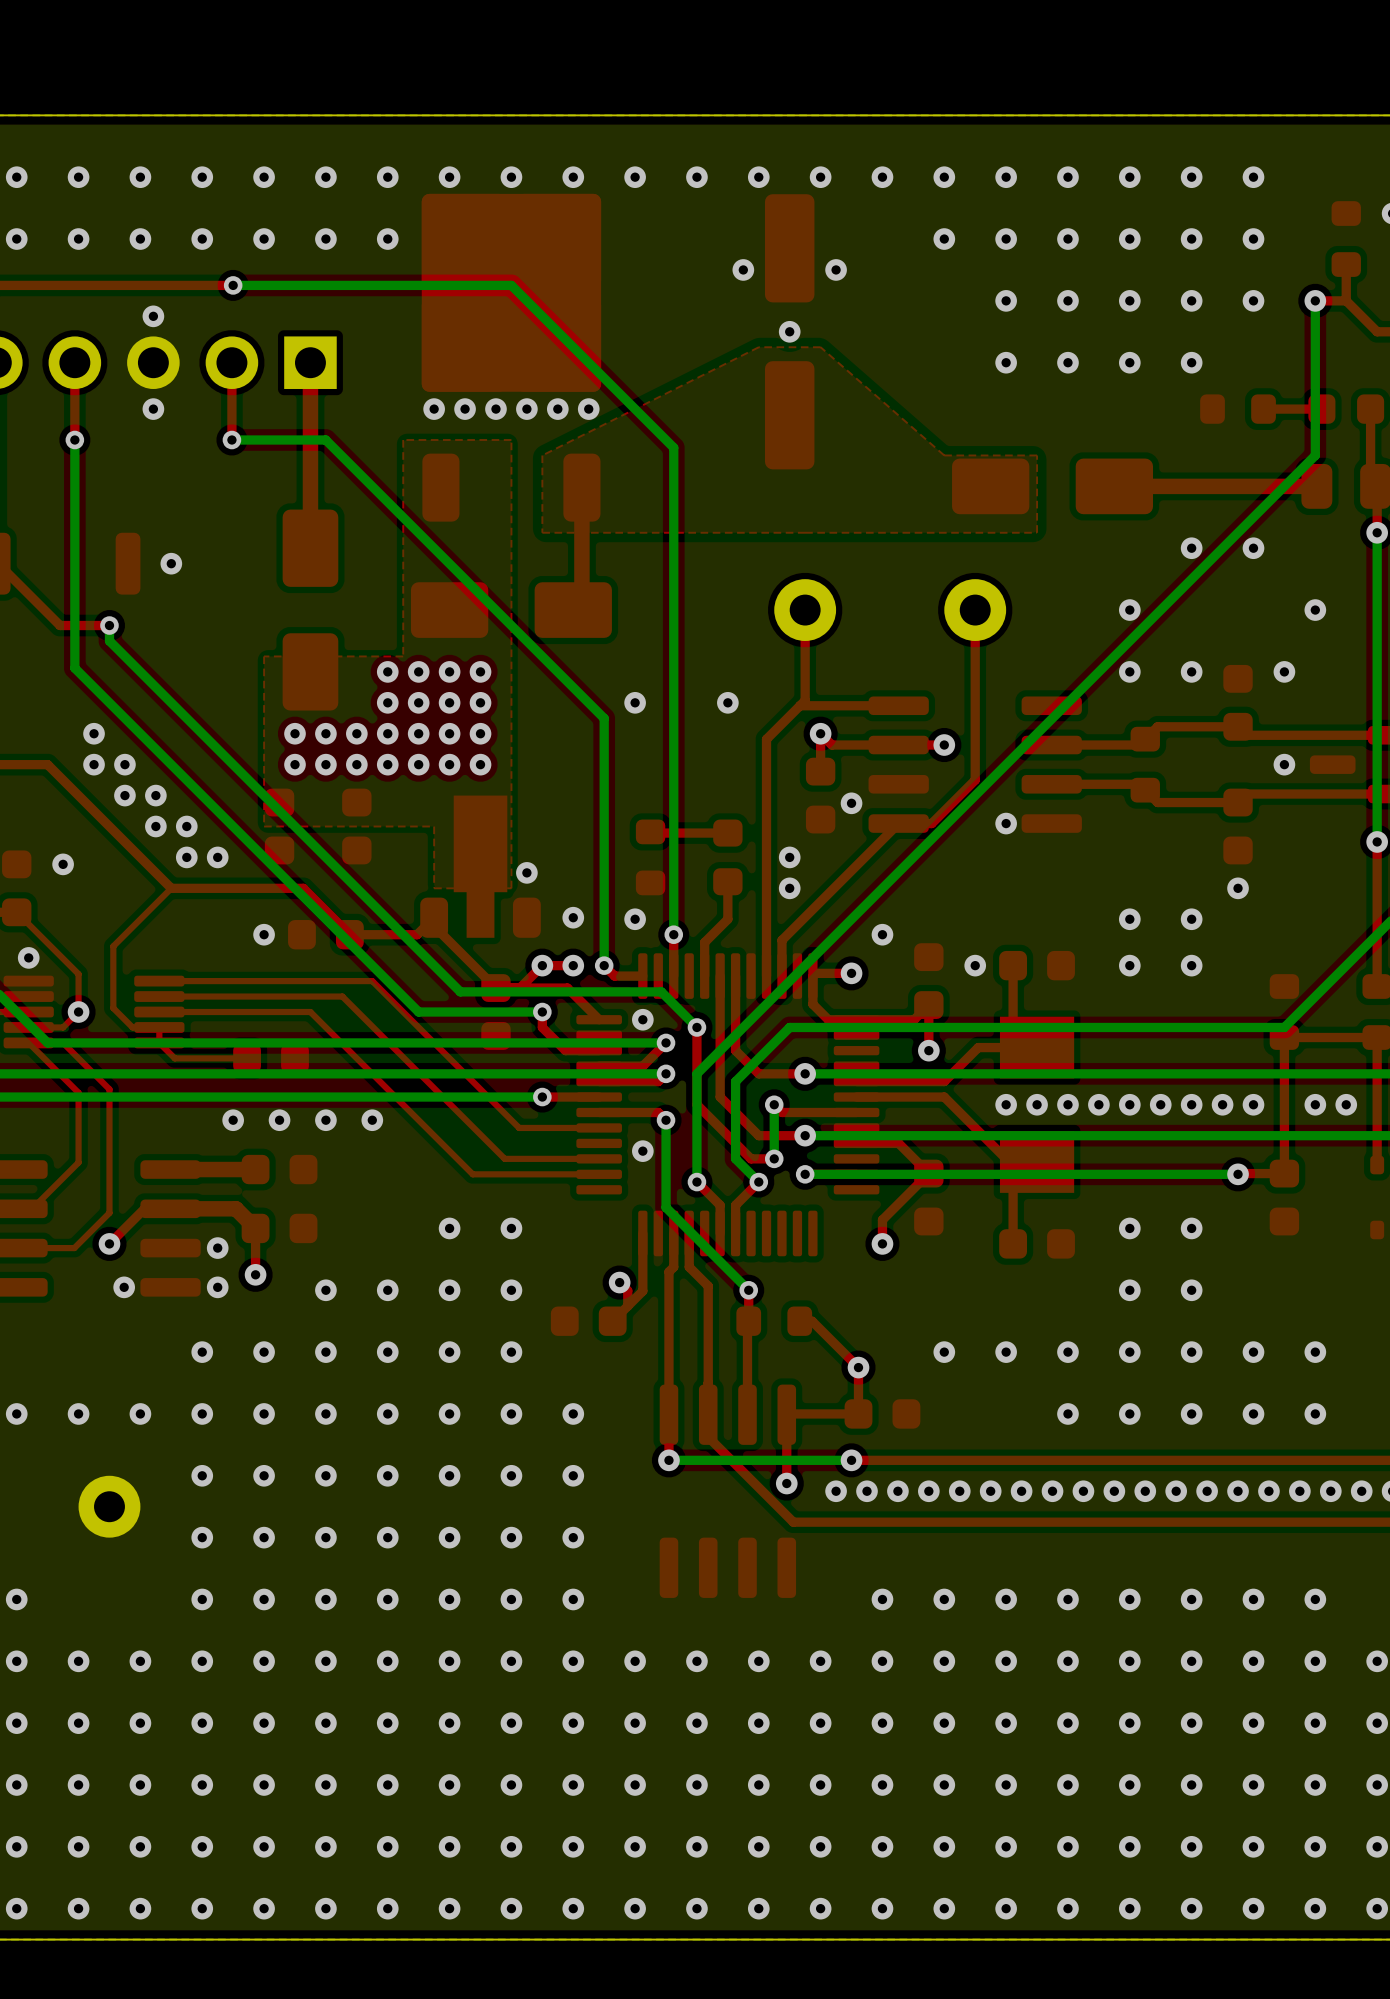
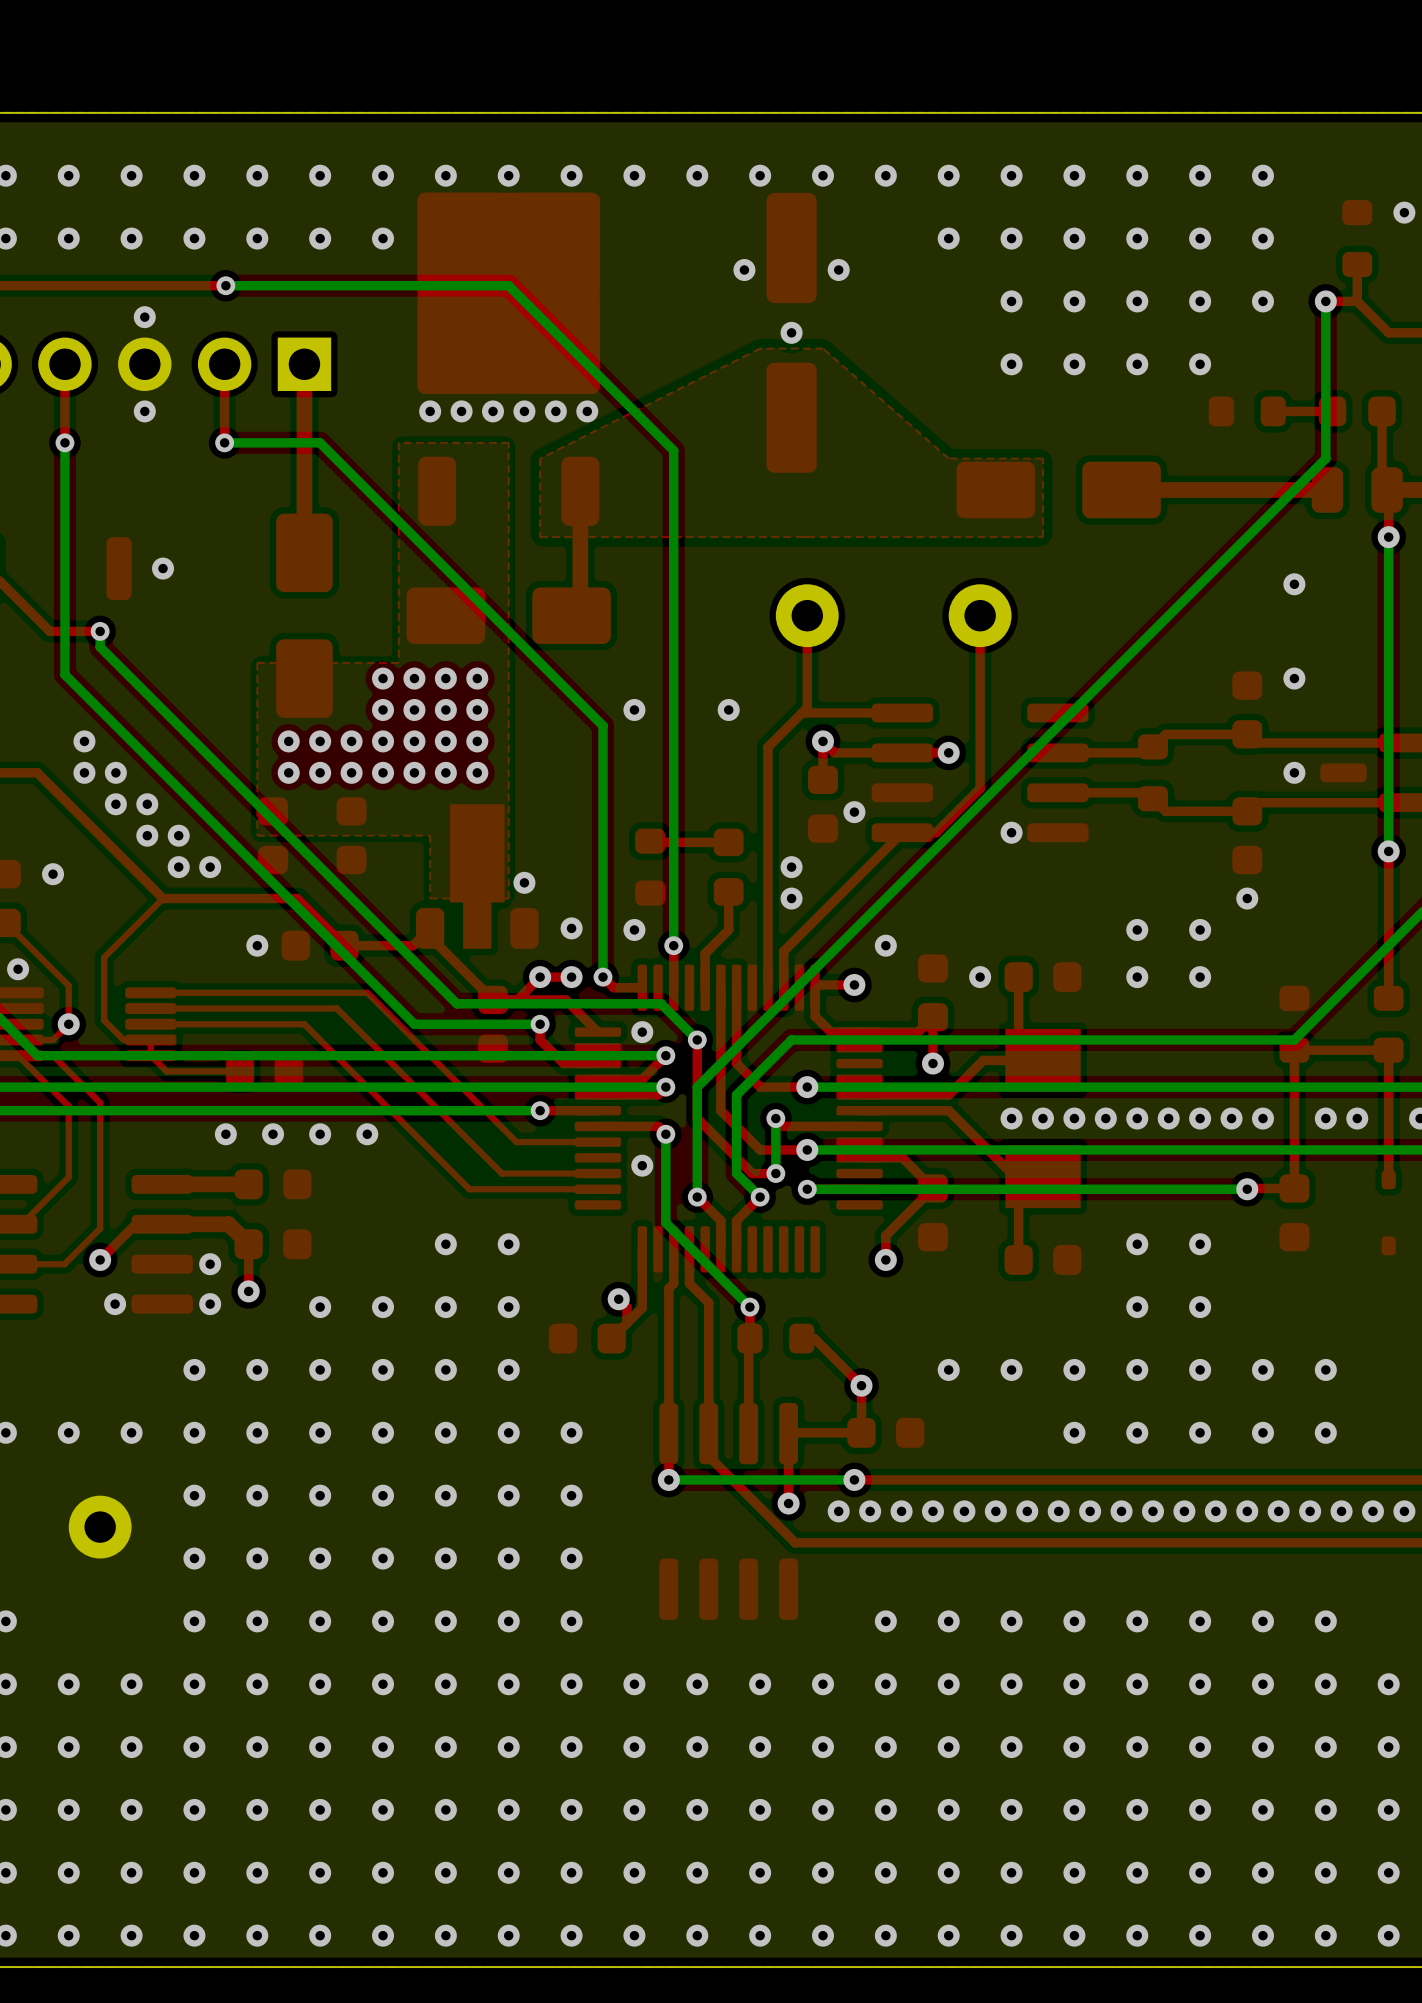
via: (1191, 548) -> none
via: (1253, 548) -> none
via: none -> (1294, 584)
via: (1129, 610) -> none
via: (1315, 610) -> none
via: (1129, 671) -> none
via: (1191, 671) -> none

